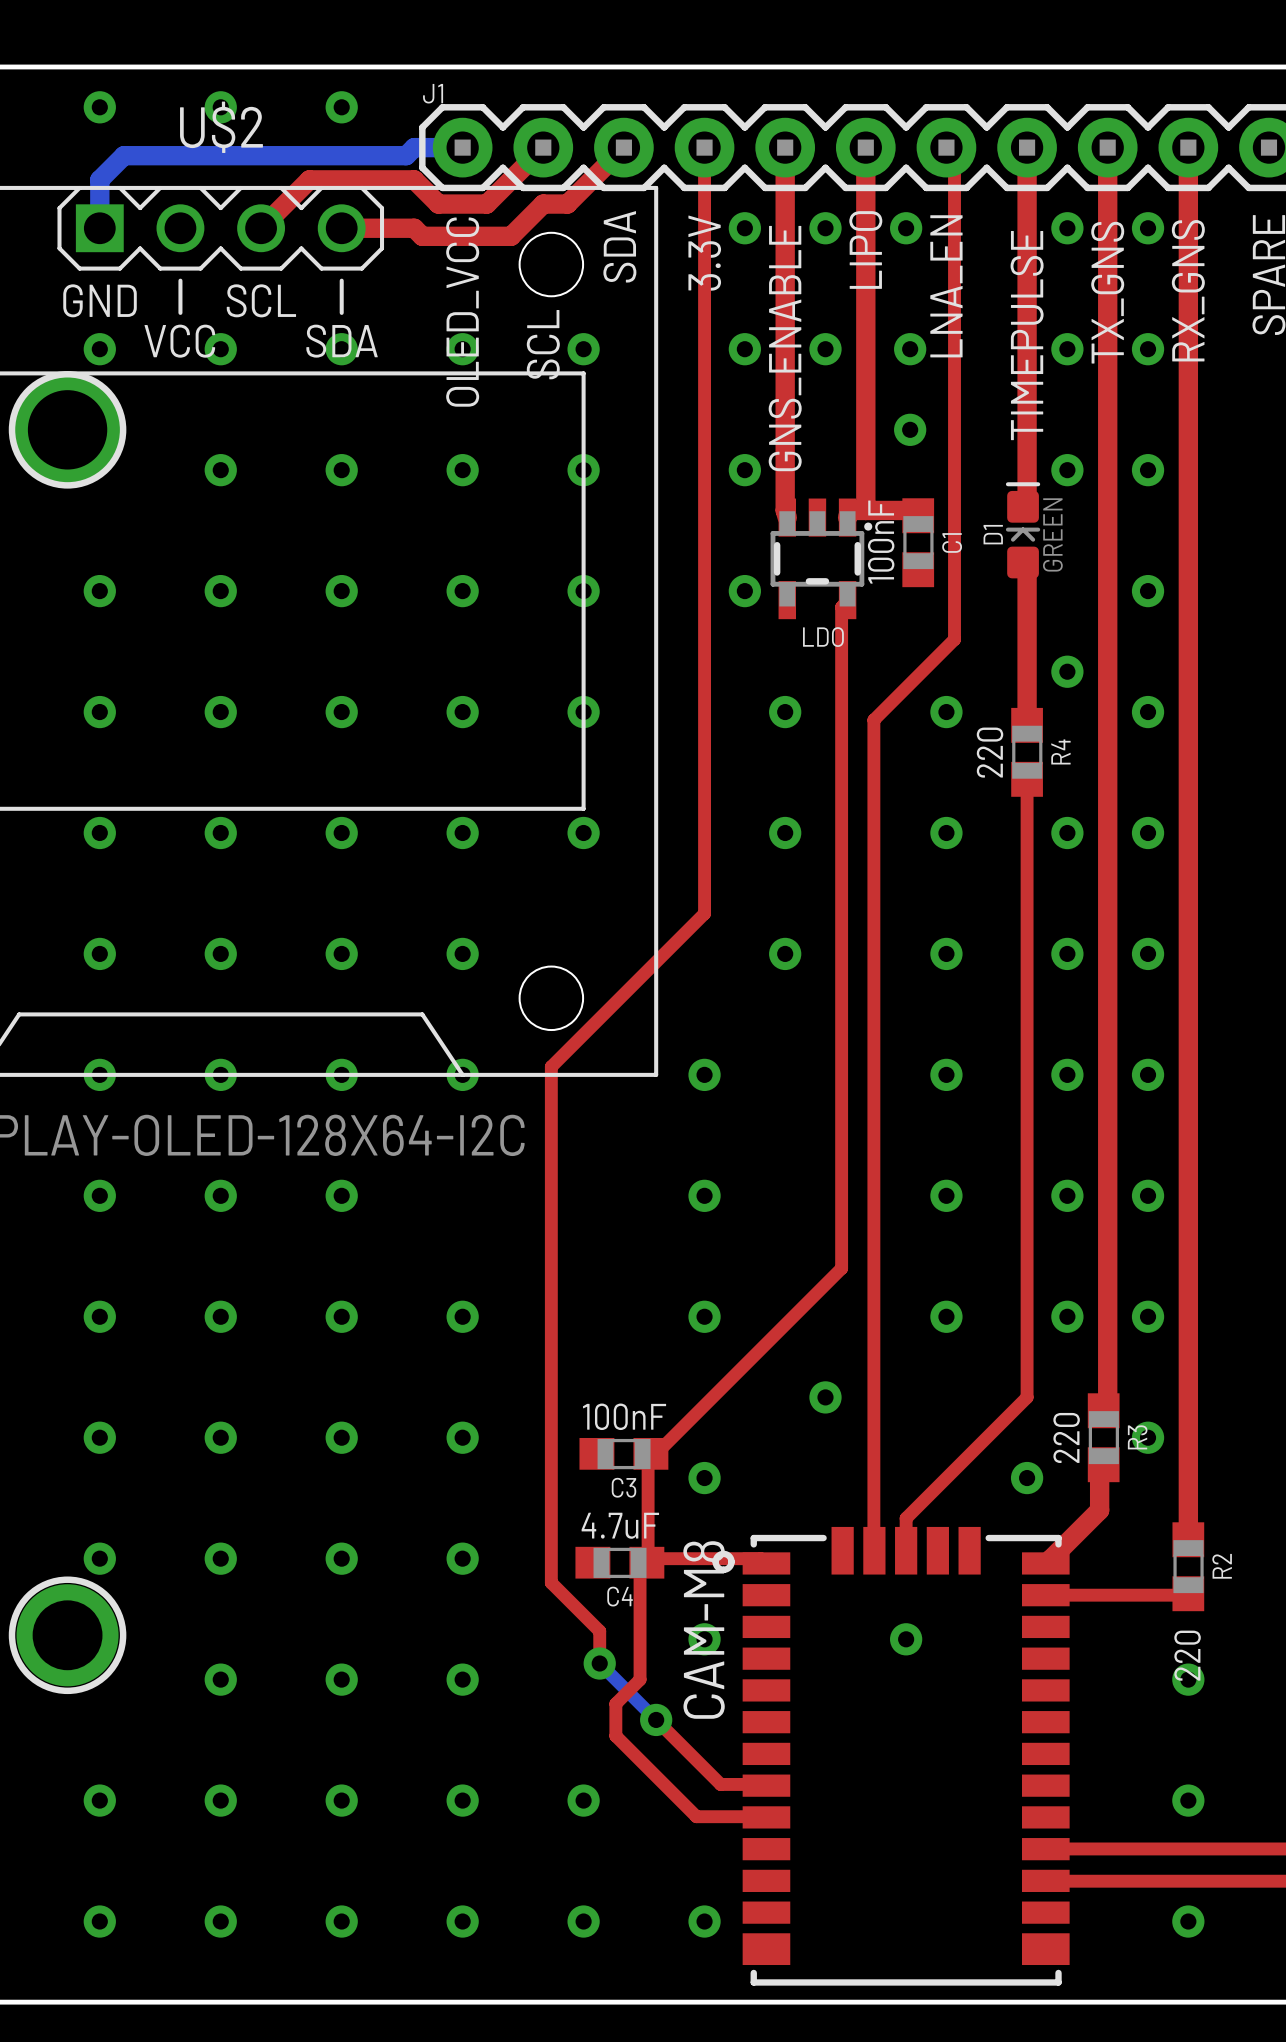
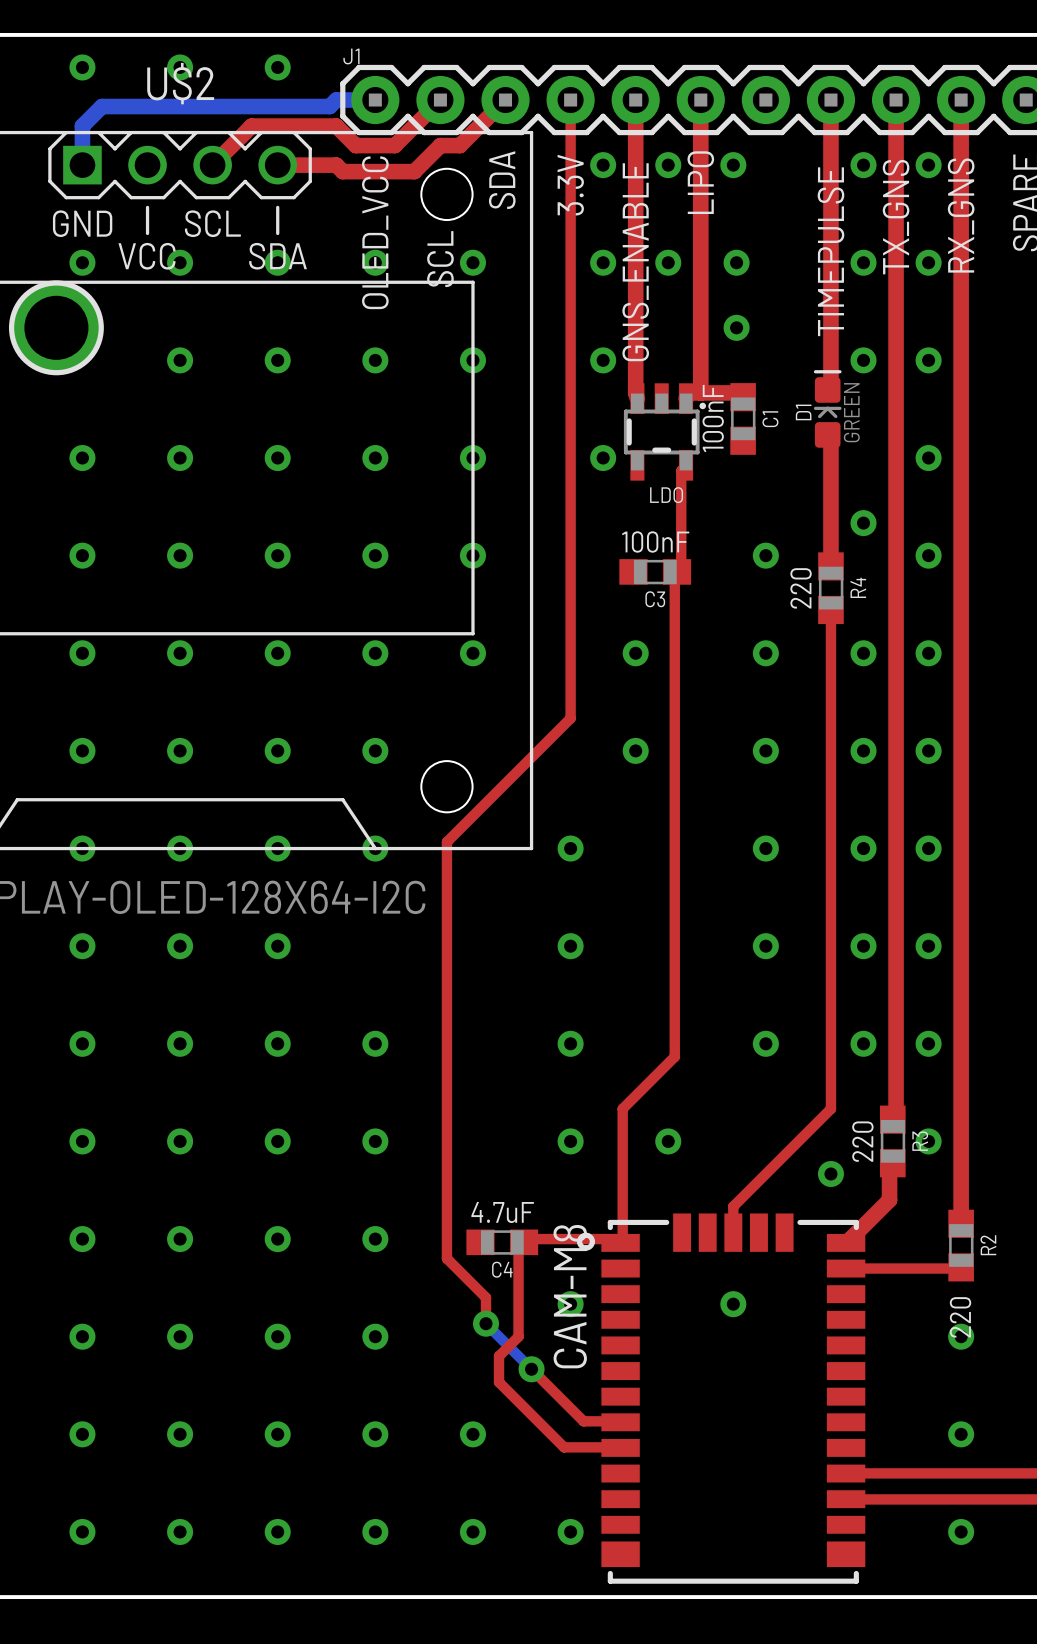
top track: (946, 147) (954, 155) (954, 639) (873, 720) (873, 1550) -> none
text: LNA_EN (946, 286) -> none
via: (785, 712) -> none
top track: (841, 728) (841, 1268) (656, 1453) (648, 1453) (648, 1558) -> (681, 568) (674, 575) (674, 1056) (622, 1108) (622, 1239) (620, 1242)
via position: (825, 1397) -> (668, 1141)
C3 position: (623, 1453) -> (655, 571)
via position: (704, 1478) -> (570, 1141)
part: (67, 1635) -> none
via: none -> (82, 1336)

